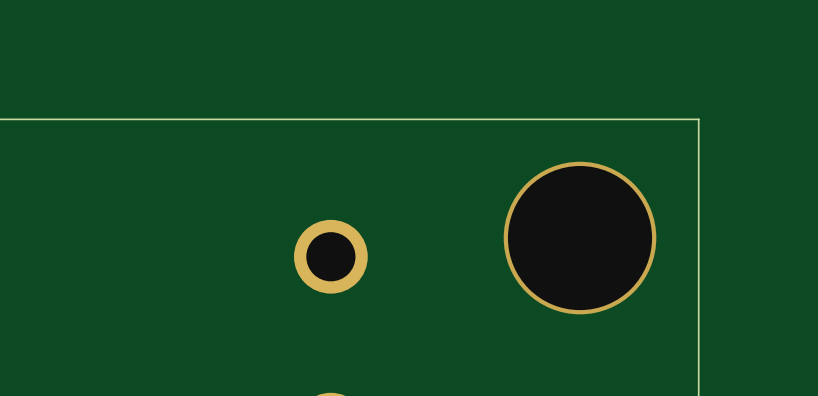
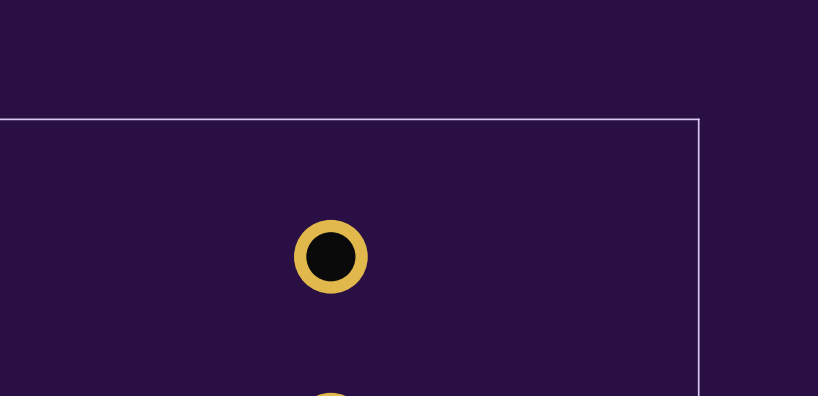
via: (580, 238) -> none

